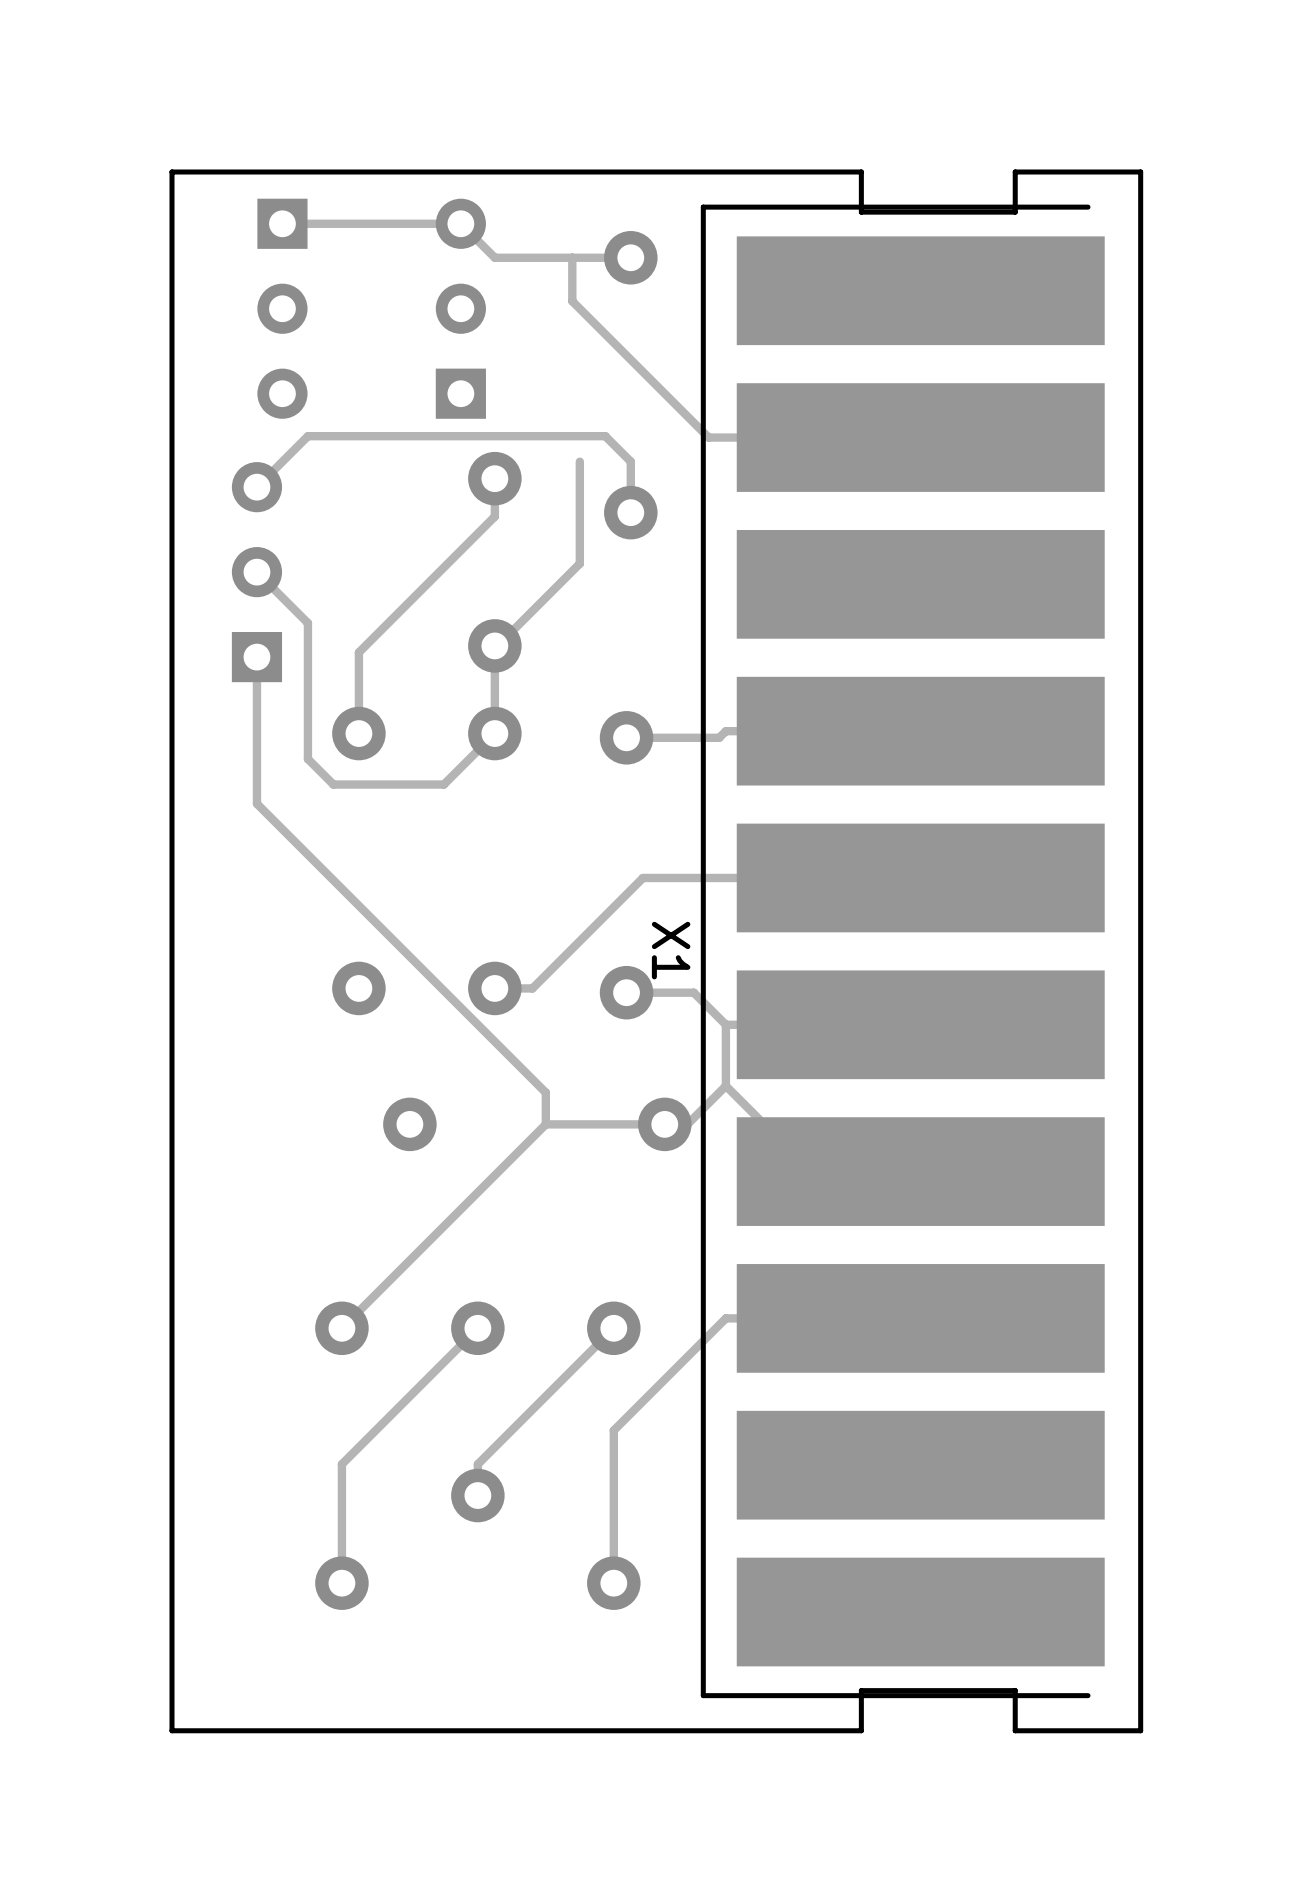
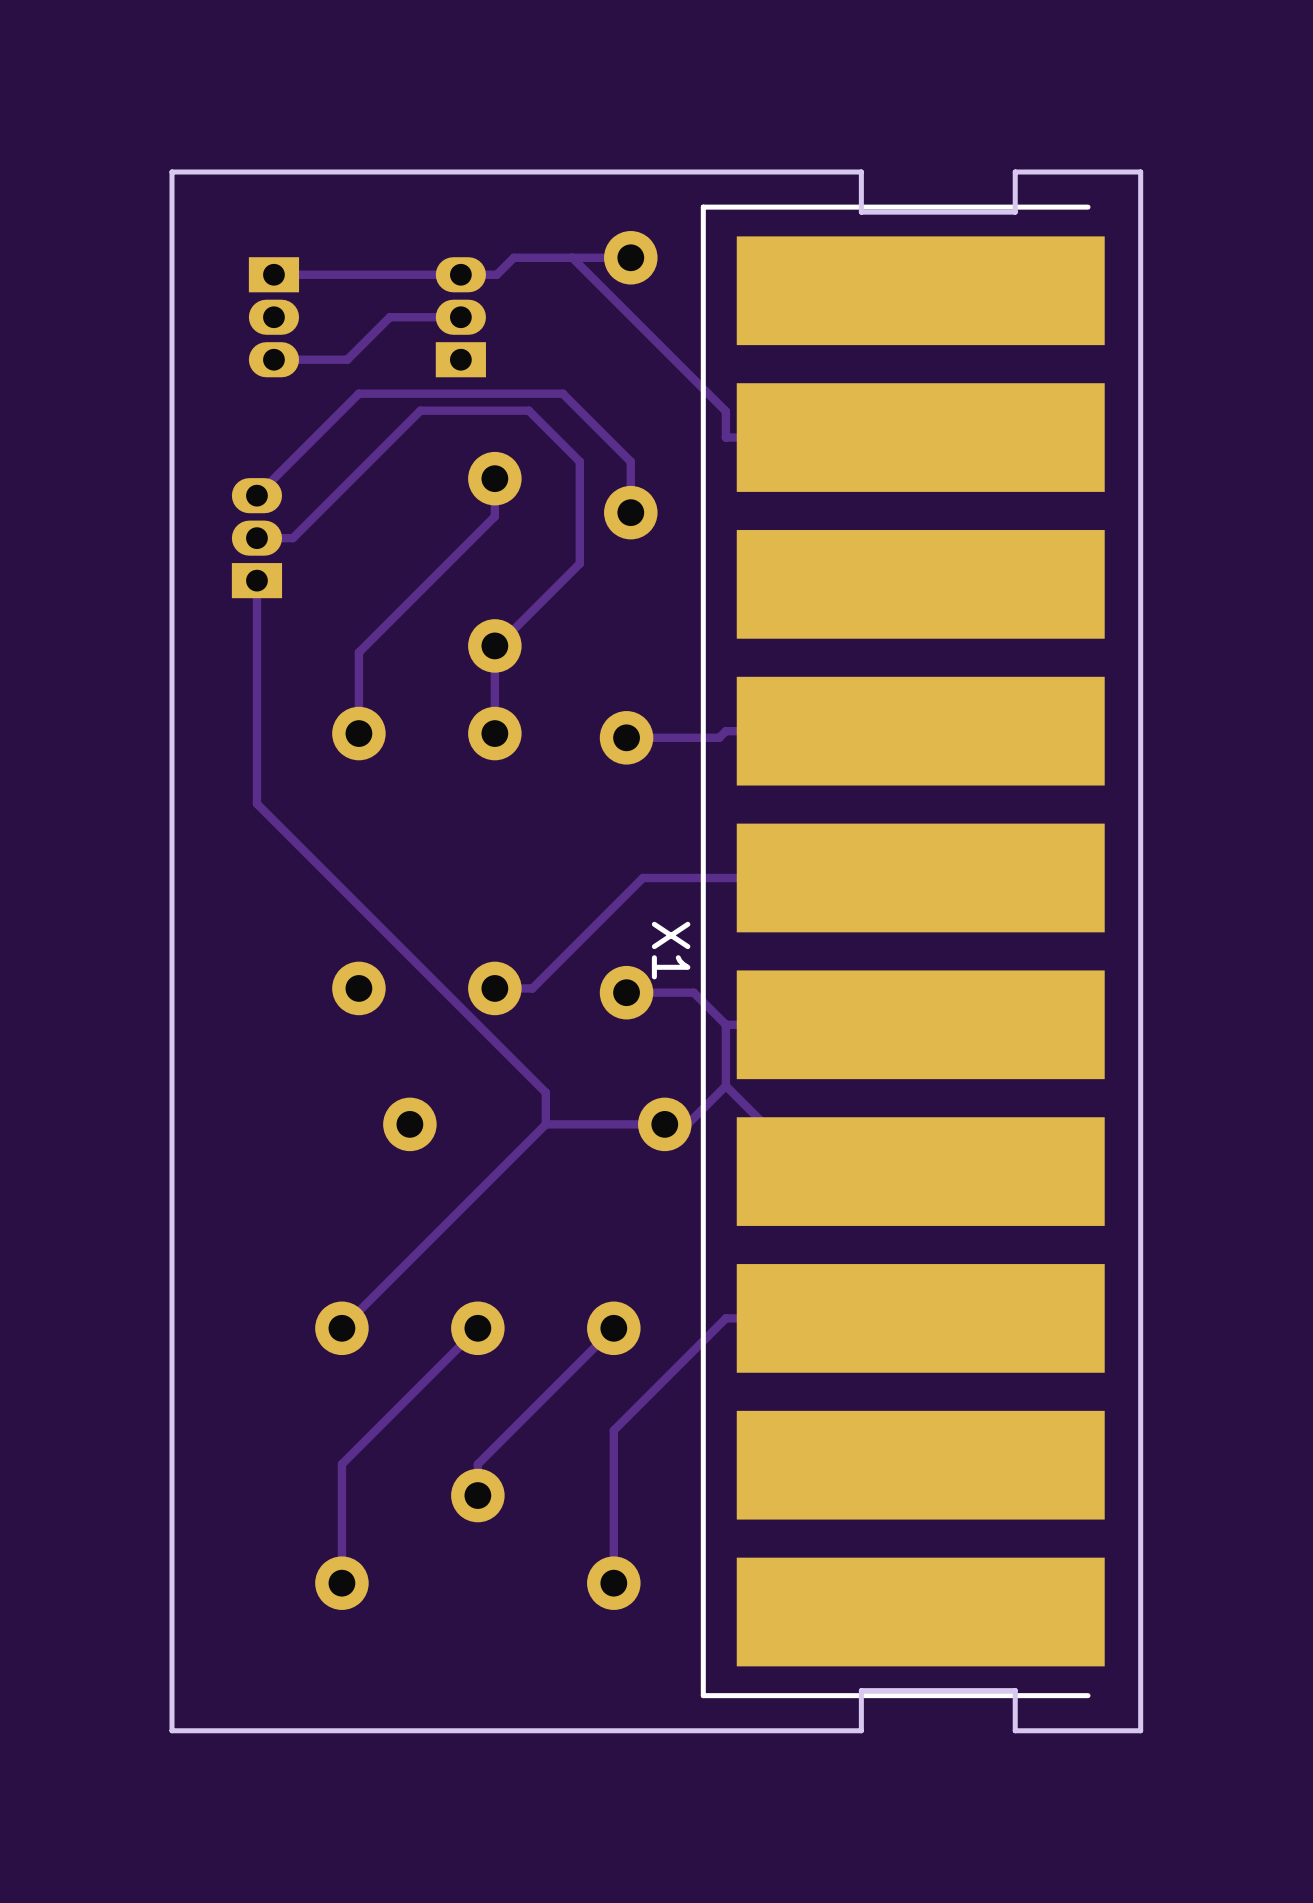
part footprint: [257, 198, 308, 419] -> [248, 257, 300, 378]
part footprint: [435, 198, 486, 419] -> [435, 257, 486, 378]
track: (282, 223) (460, 223) (494, 257) (513, 257) -> (273, 274) (496, 274) (513, 257)
track: (572, 257) (572, 301) (708, 437) (725, 437) -> (572, 257) (725, 411) (725, 437)
track: none -> (460, 317) (389, 317) (347, 359) (273, 359)
track: (605, 436) (307, 436) (256, 487) -> (605, 436) (562, 393) (358, 393) (256, 495)
track: none -> (579, 461) (528, 410) (420, 410) (292, 538) (256, 538)
part: none -> (256, 538)
track: (256, 572) (307, 623) (307, 759) (333, 784) (443, 784) (494, 733) -> none
part: (256, 572) -> none
track: none -> (256, 580) (256, 657)

